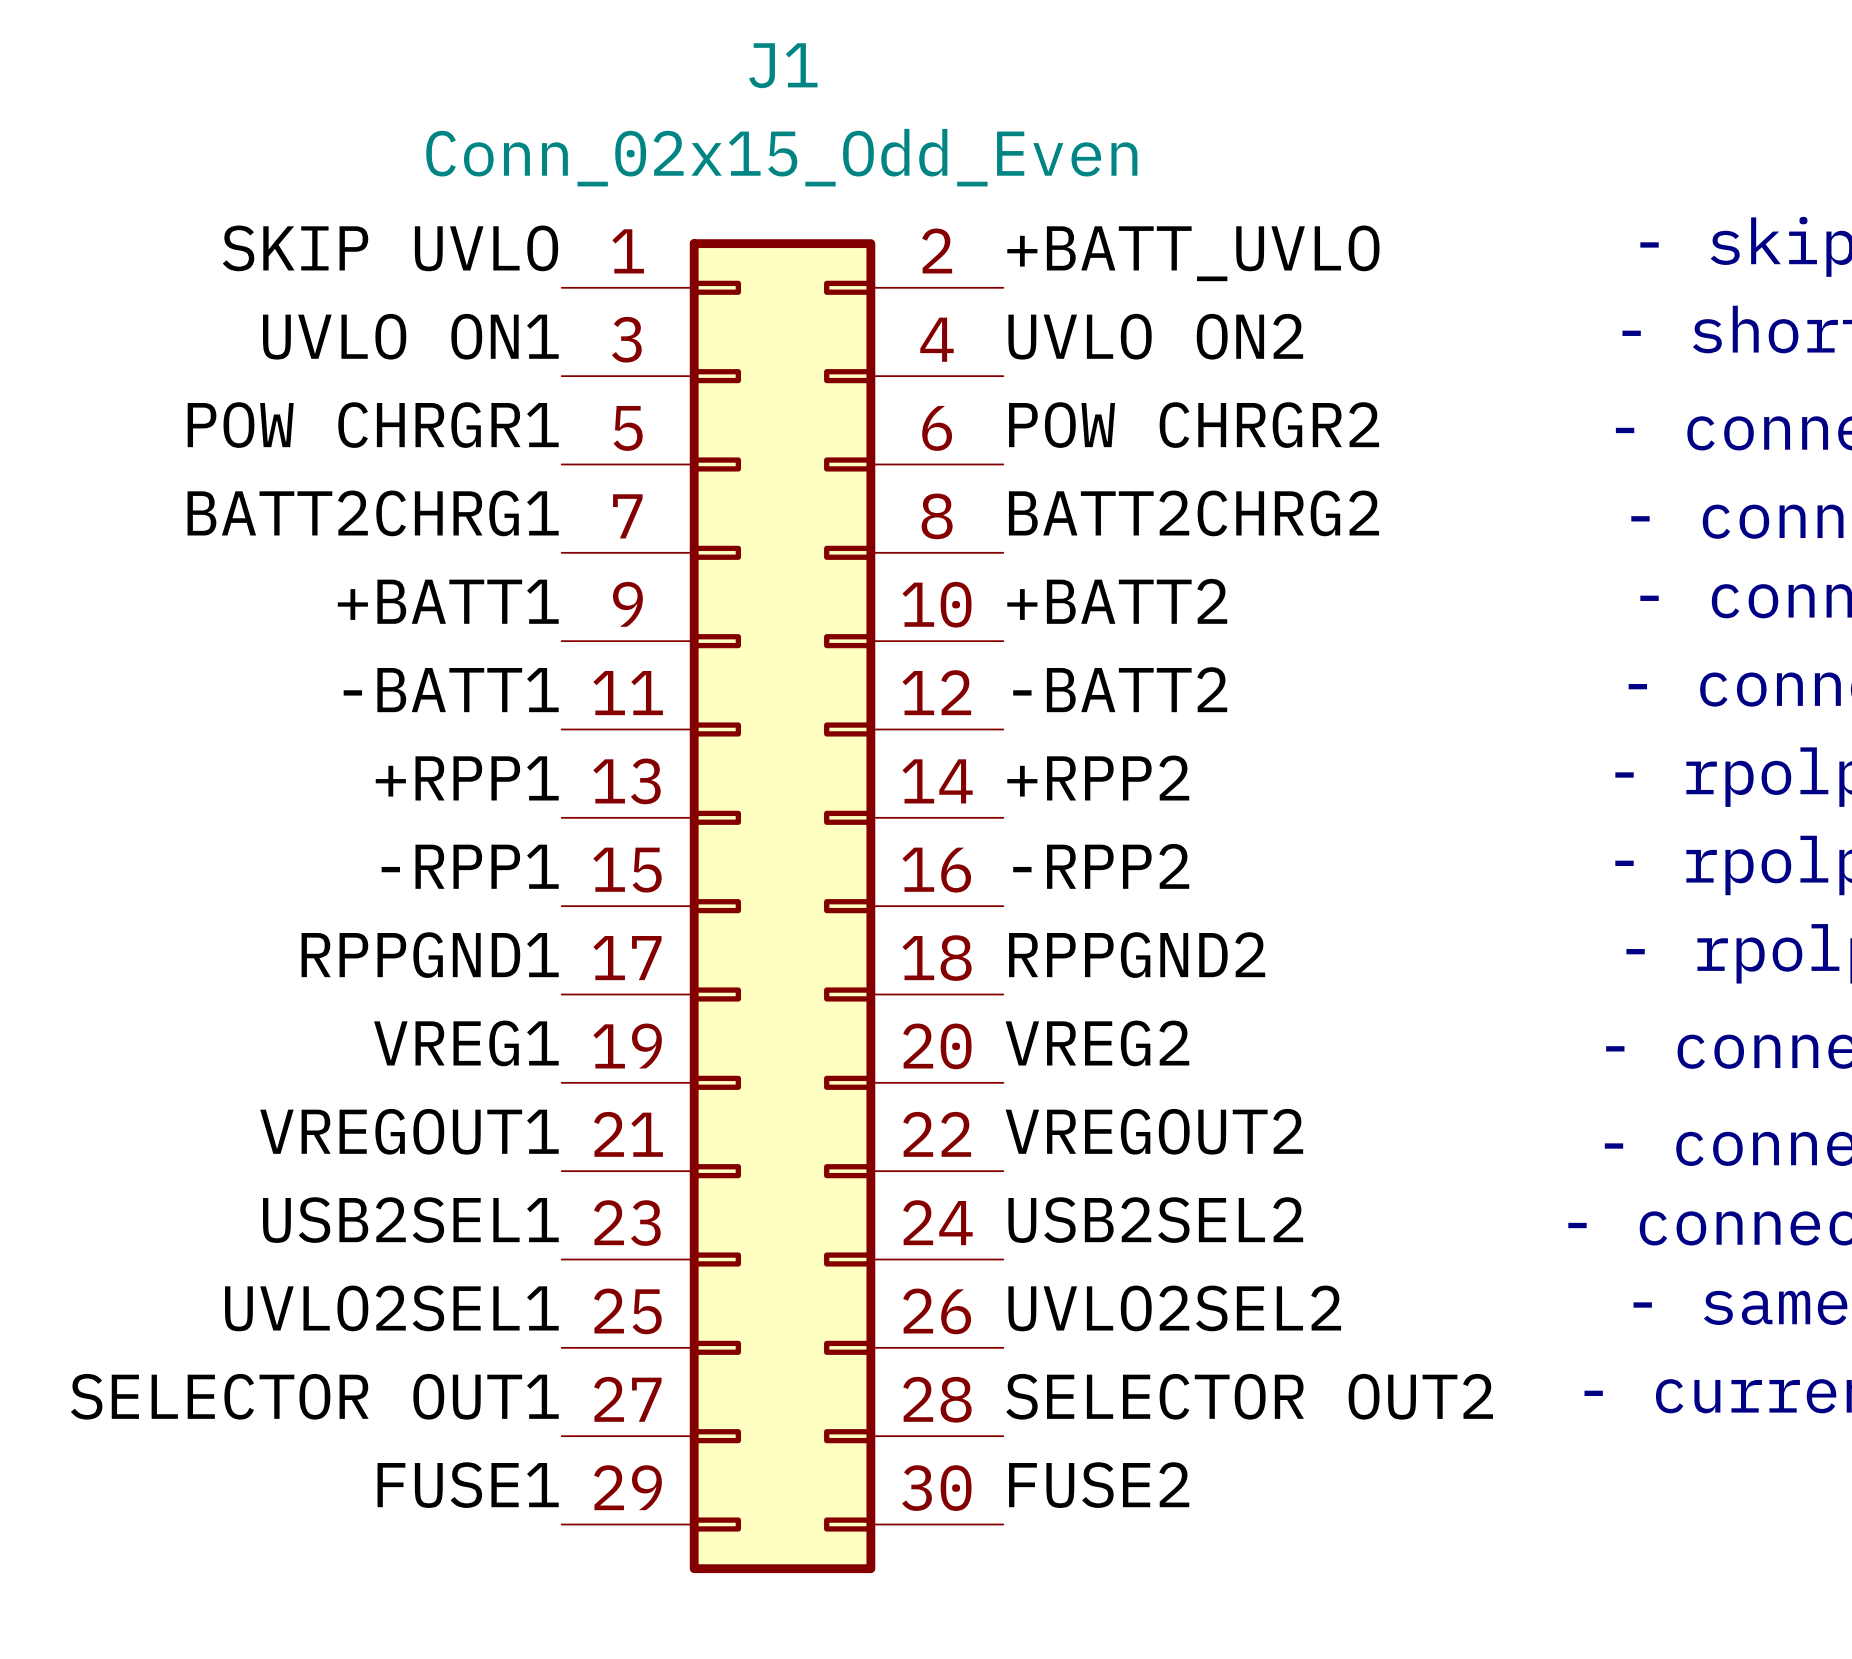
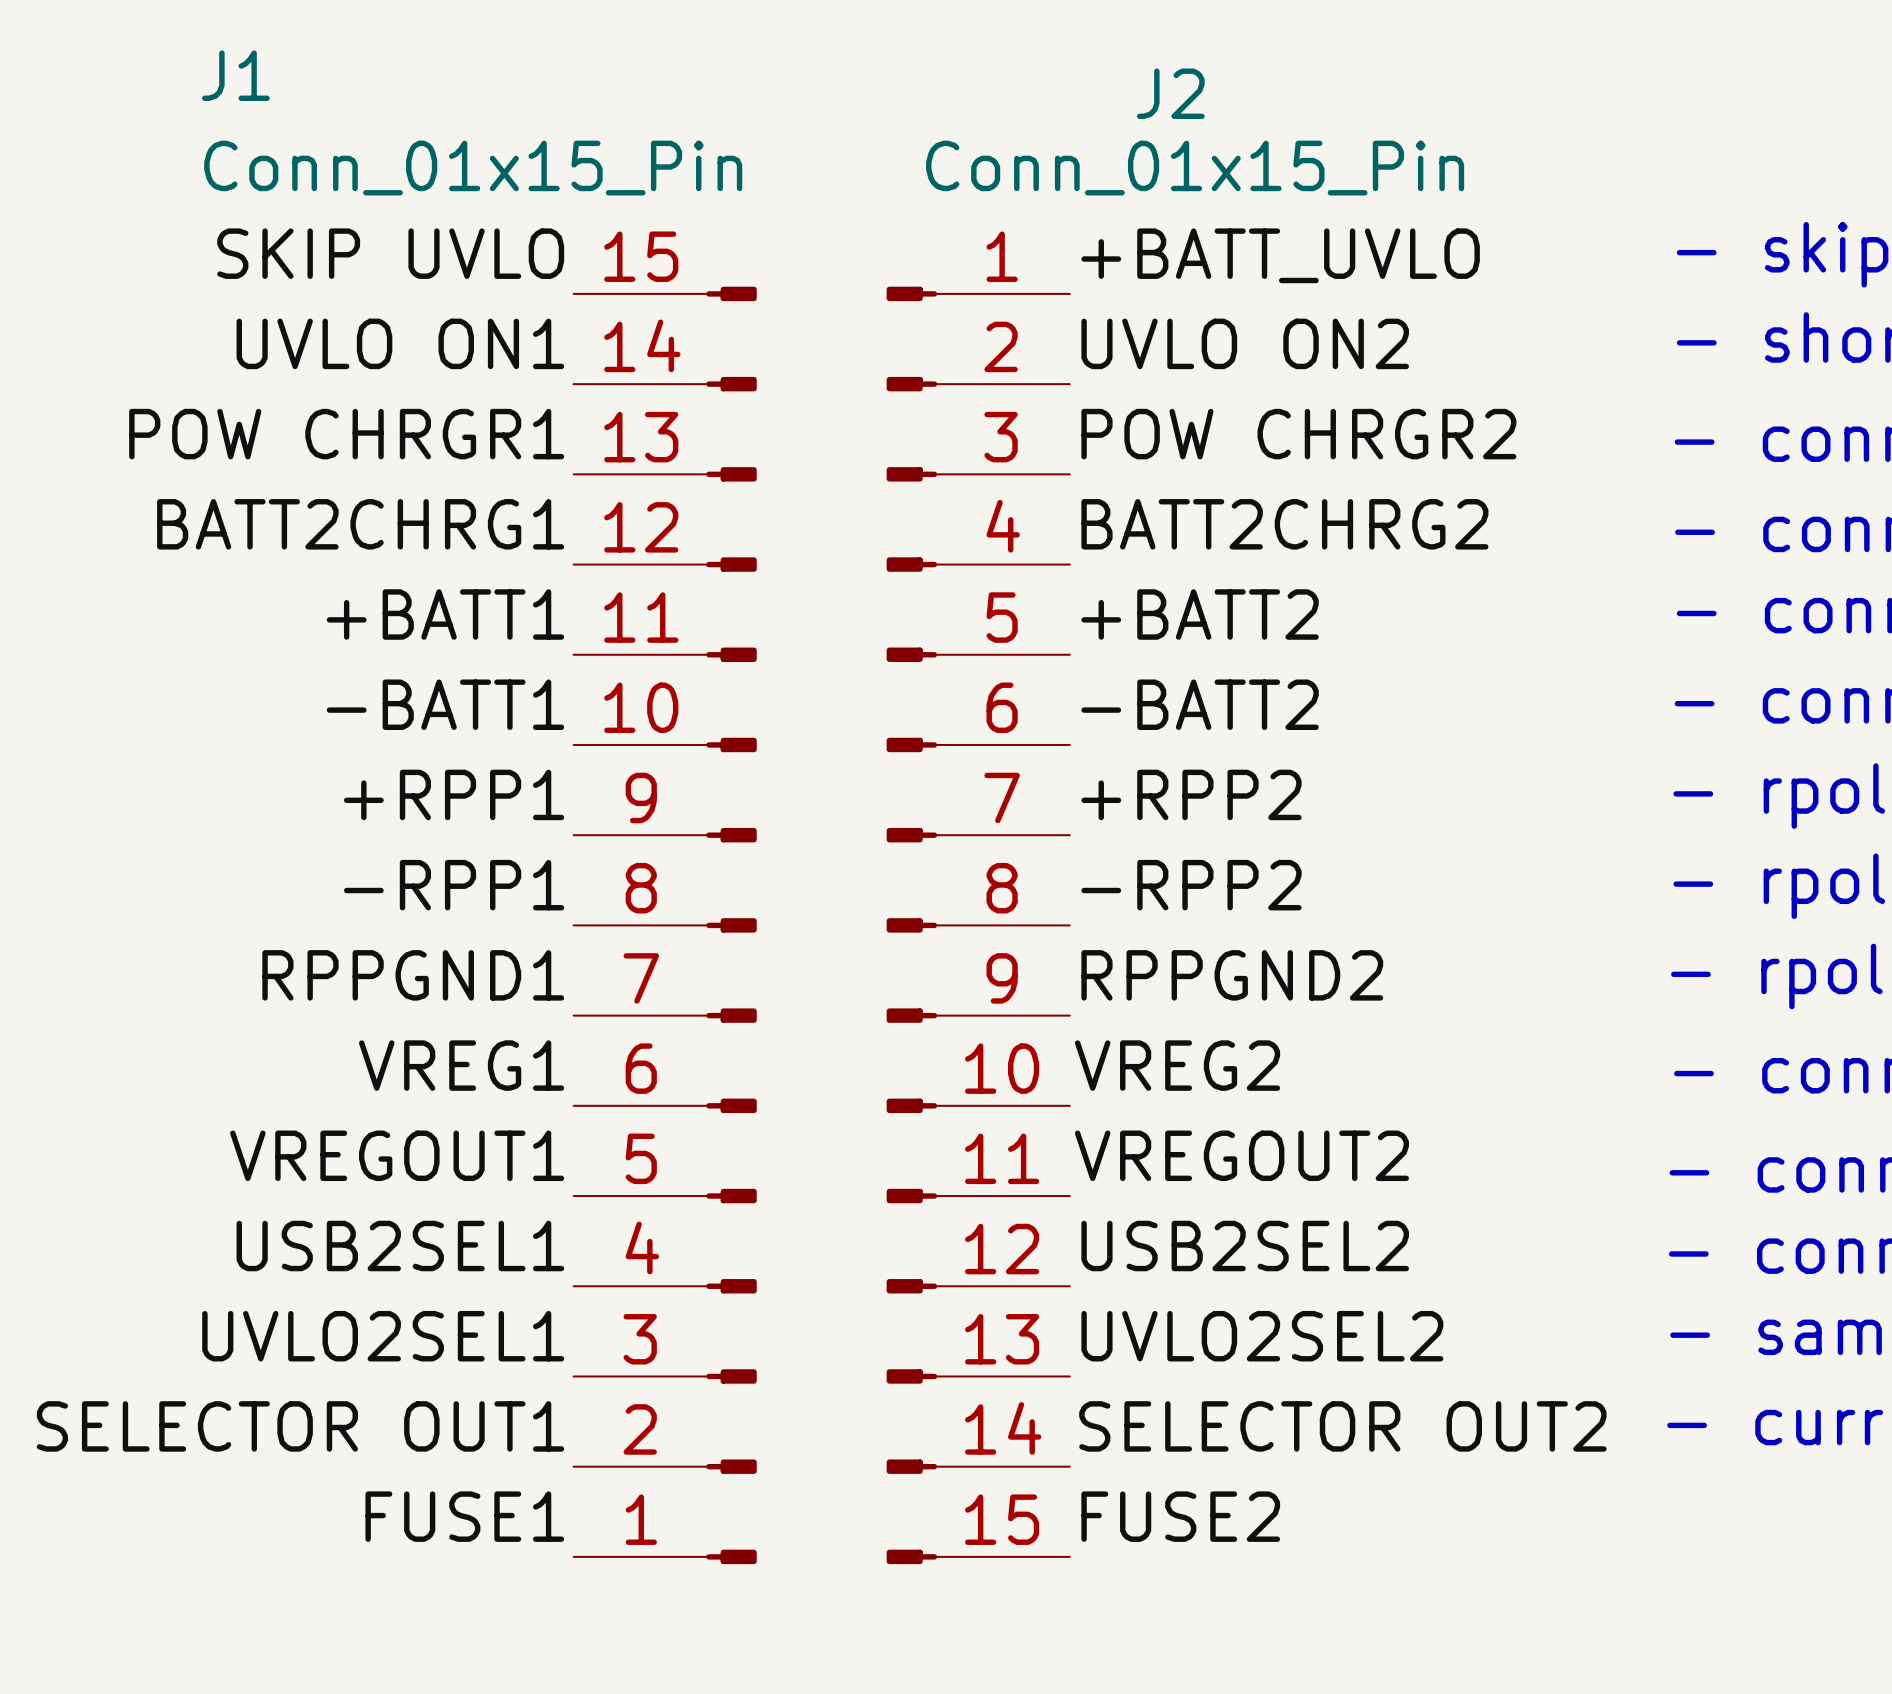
J1 name position: J1 (783, 65) -> J1 (235, 75)
J1 value: Conn_02x15_Odd_Even (781, 157) -> Conn_01x15_Pin (473, 168)
J1 symbol: [561, 239, 1004, 1574] -> [573, 286, 757, 1565]
label position: +BATT_UVLO (1193, 253) -> +BATT_UVLO (1280, 255)
label position: UVLO ON2 (1155, 336) -> UVLO ON2 (1245, 343)
label position: POW CHRGR2 (1194, 425) -> POW CHRGR2 (1298, 434)
label position: BATT2CHRG2 (1194, 513) -> BATT2CHRG2 (1284, 524)
label position: +BATT2 (1117, 601) -> +BATT2 (1200, 614)
label position: -BATT2 (1120, 689) -> -BATT2 (1200, 704)
label position: +RPP2 (1098, 778) -> +RPP2 (1191, 794)
label position: -RPP2 (1101, 866) -> -RPP2 (1191, 885)
J2: none -> Conn_01x15_Pin (978, 925)
label position: RPPGND2 (1137, 955) -> RPPGND2 (1232, 975)
label position: VREG2 (1097, 1043) -> VREG2 (1177, 1065)
label position: VREGOUT2 (1154, 1131) -> VREGOUT2 (1241, 1155)
label position: USB2SEL2 (1155, 1220) -> USB2SEL2 (1245, 1246)
label position: UVLO2SEL2 (1174, 1308) -> UVLO2SEL2 (1262, 1336)
label position: SELECTOR OUT2 (1249, 1396) -> SELECTOR OUT2 (1342, 1426)
label position: FUSE2 (1099, 1485) -> FUSE2 (1180, 1516)

